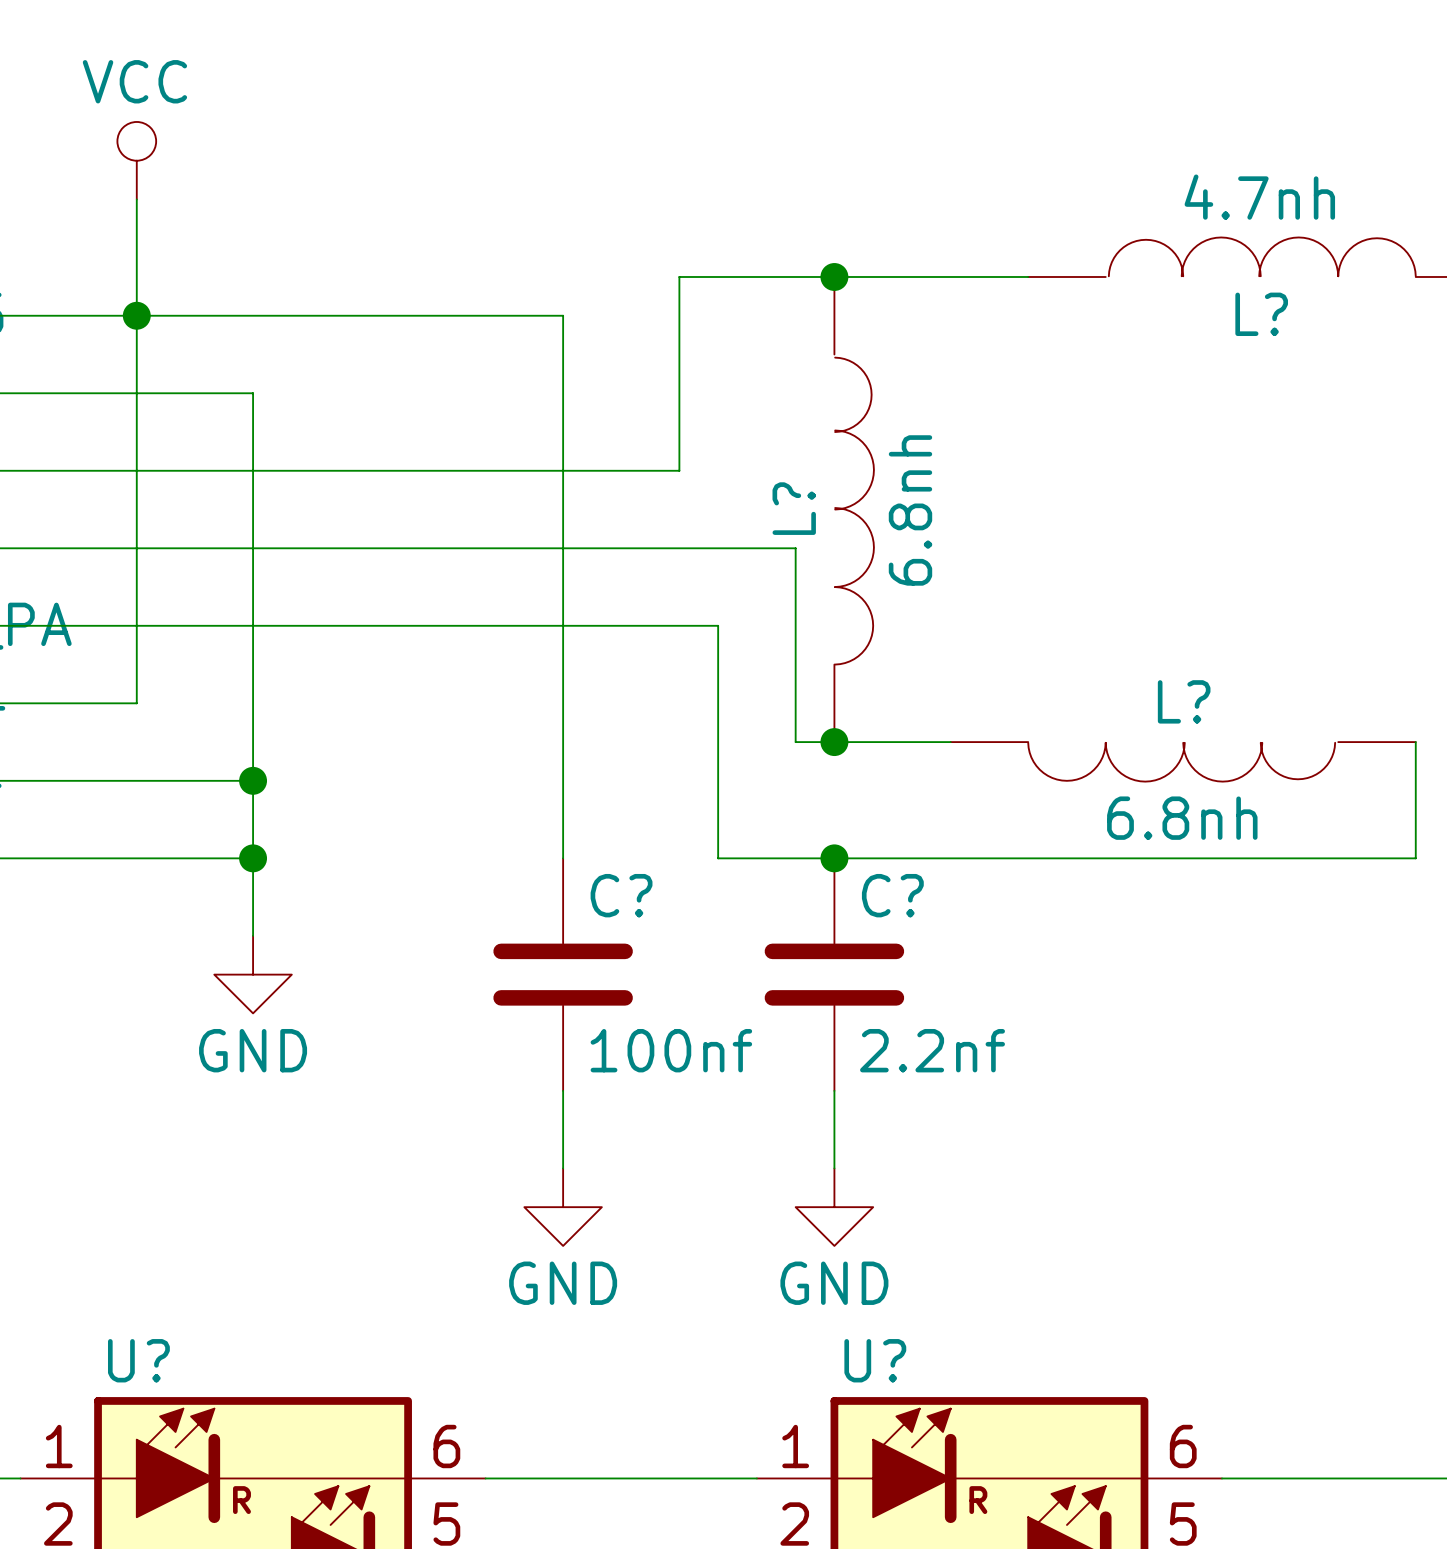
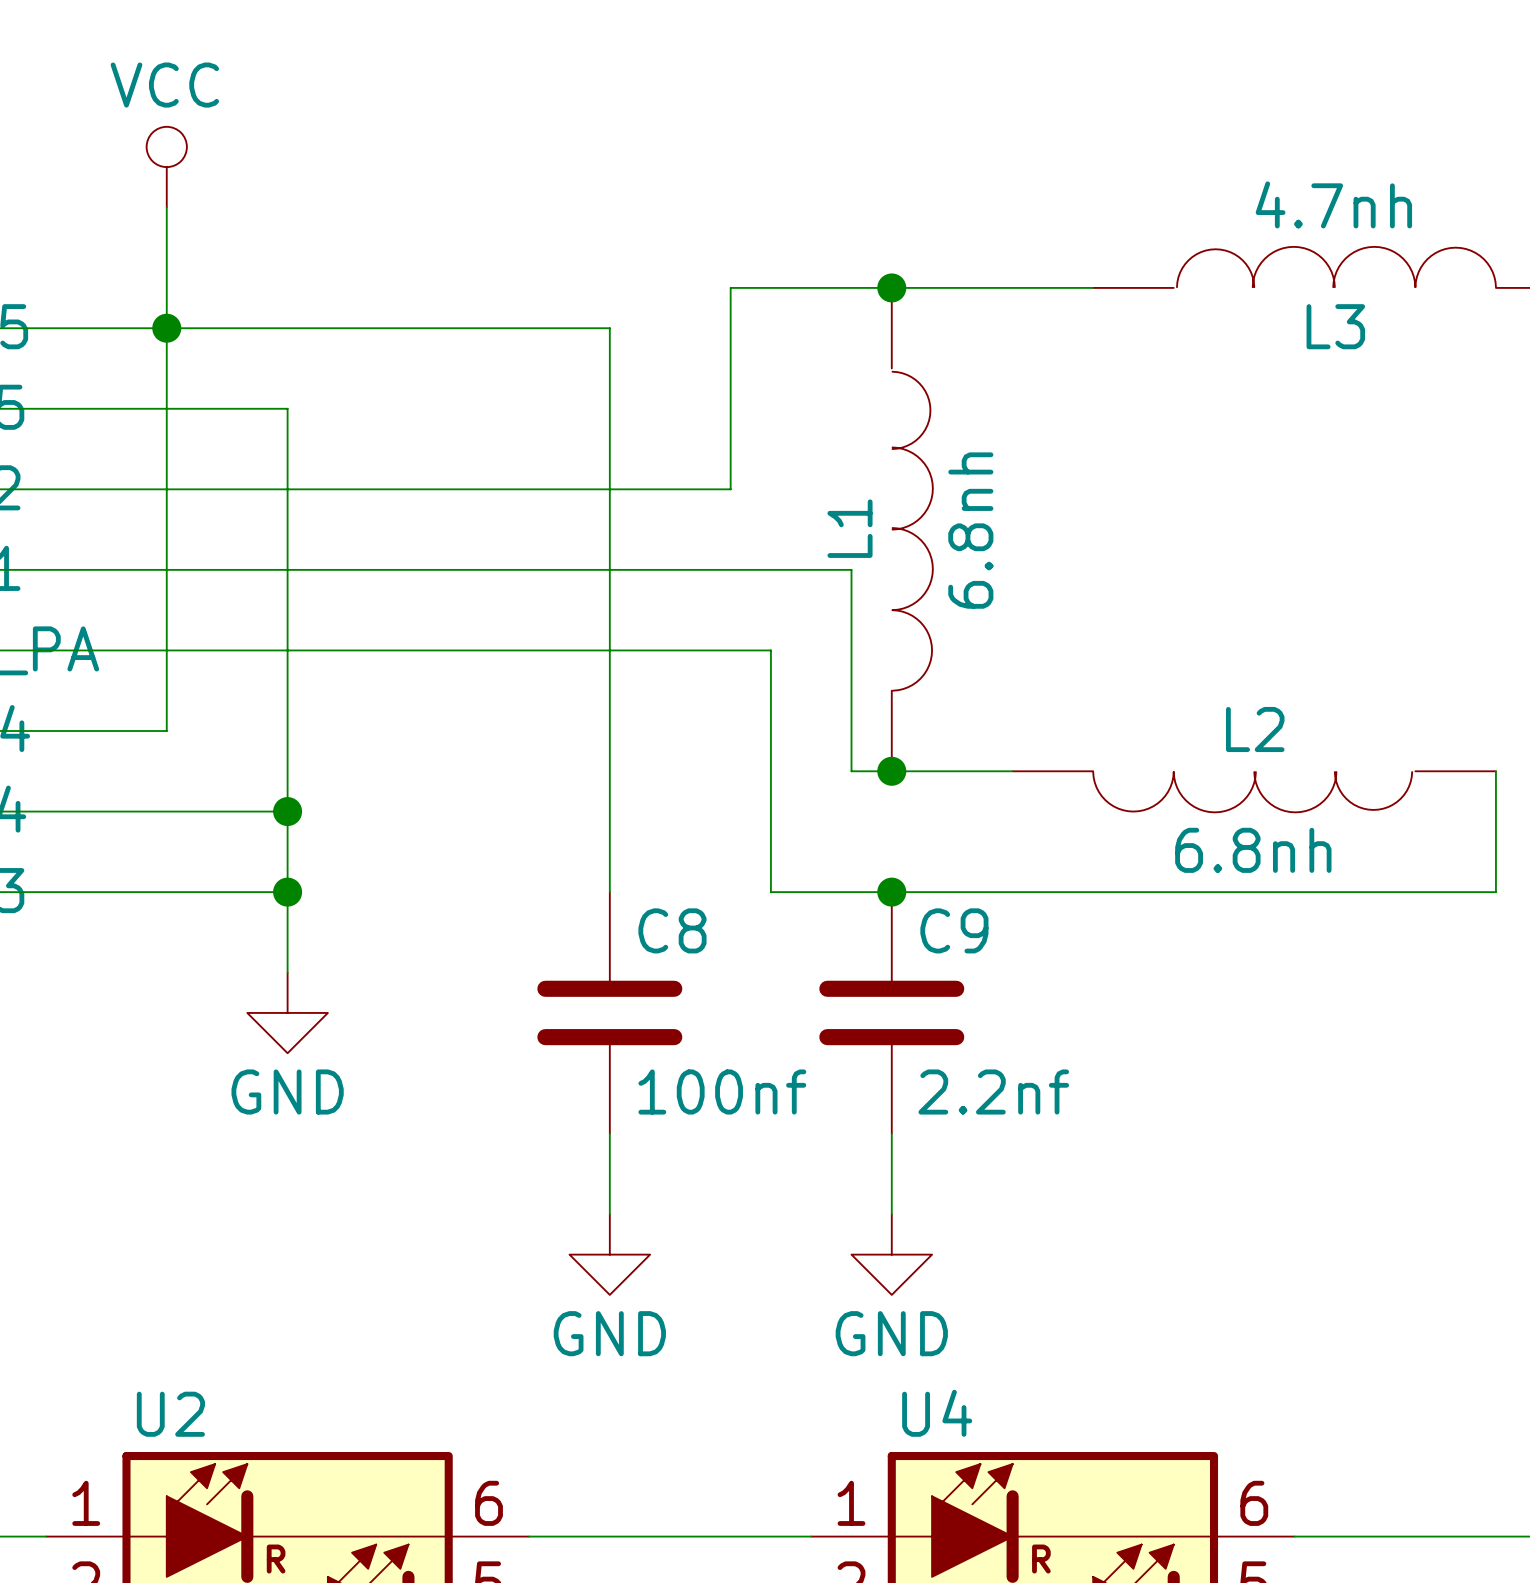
L? name: L? (1261, 314) -> L3 (1335, 326)
L? name: L? (794, 508) -> L1 (850, 528)
L? name: L? (1184, 701) -> L2 (1255, 729)
C? name: C? (621, 895) -> C8 (672, 930)
C? name: C? (892, 895) -> C9 (954, 930)
U? name: U? (138, 1360) -> U2 (170, 1414)
U? name: U? (875, 1360) -> U4 (937, 1413)

